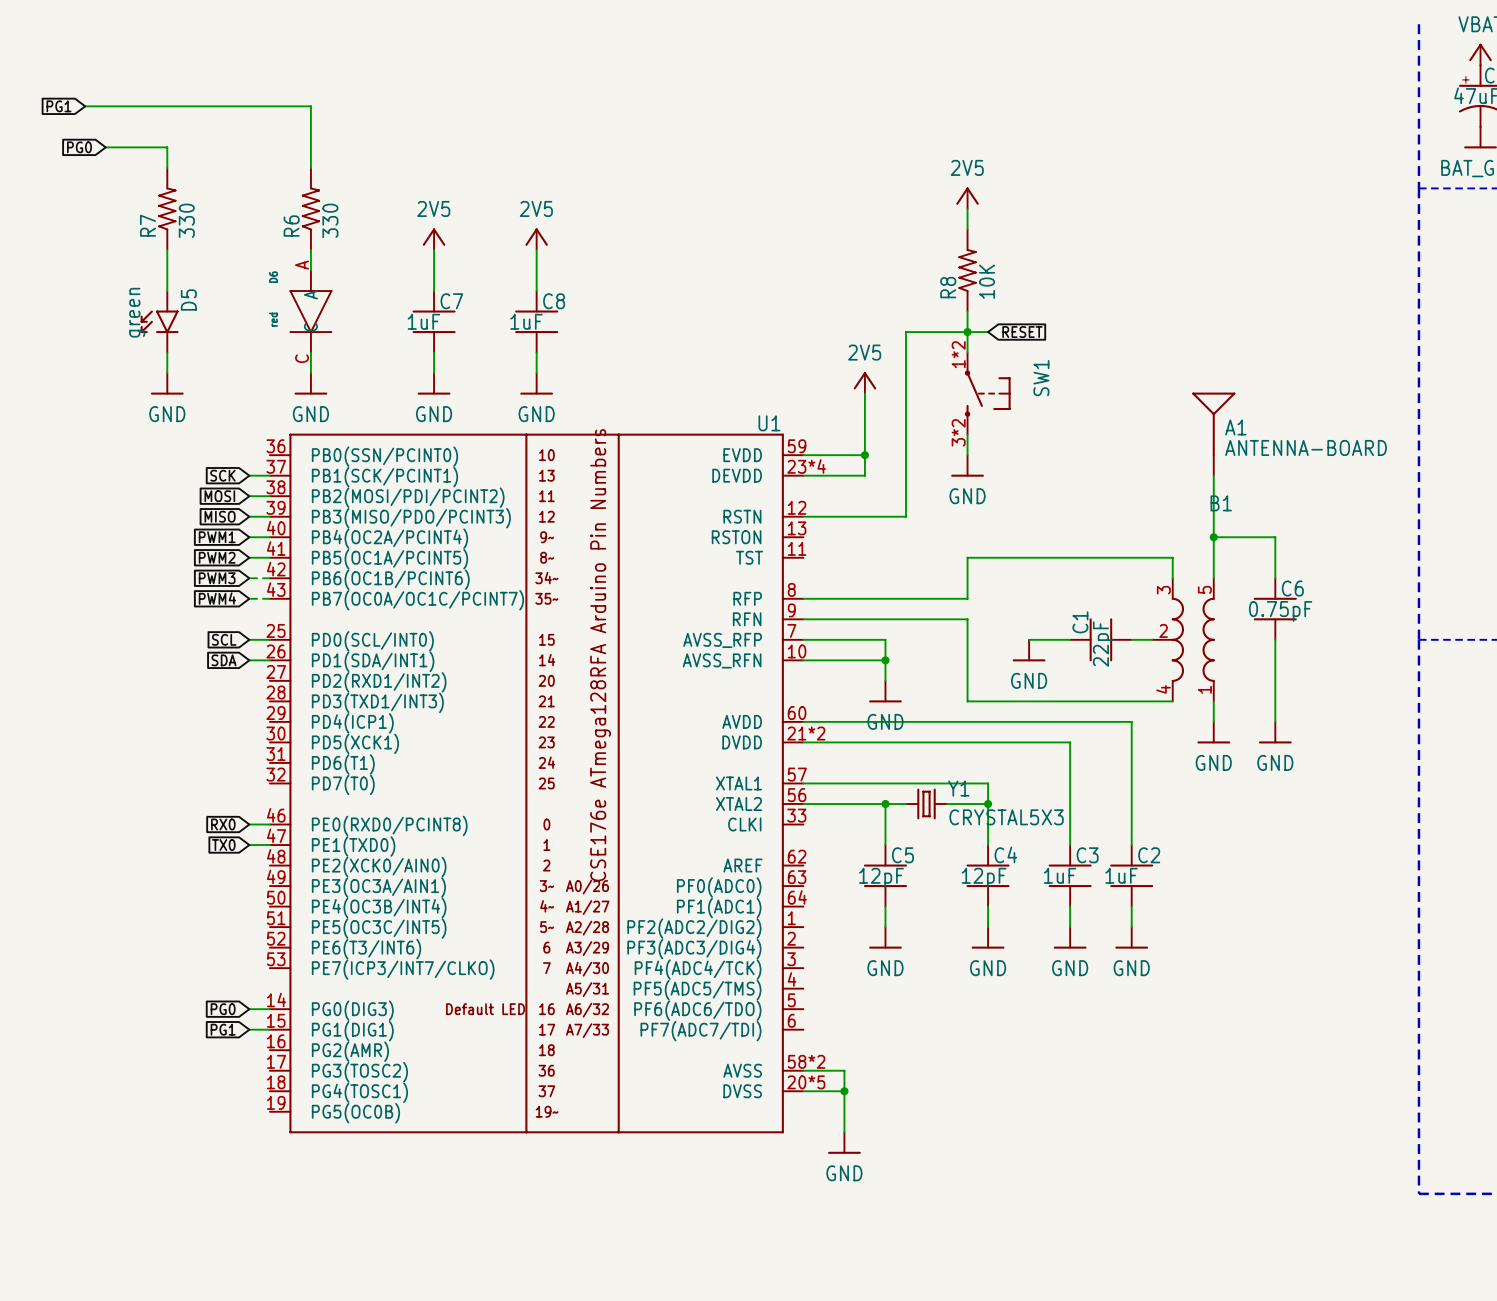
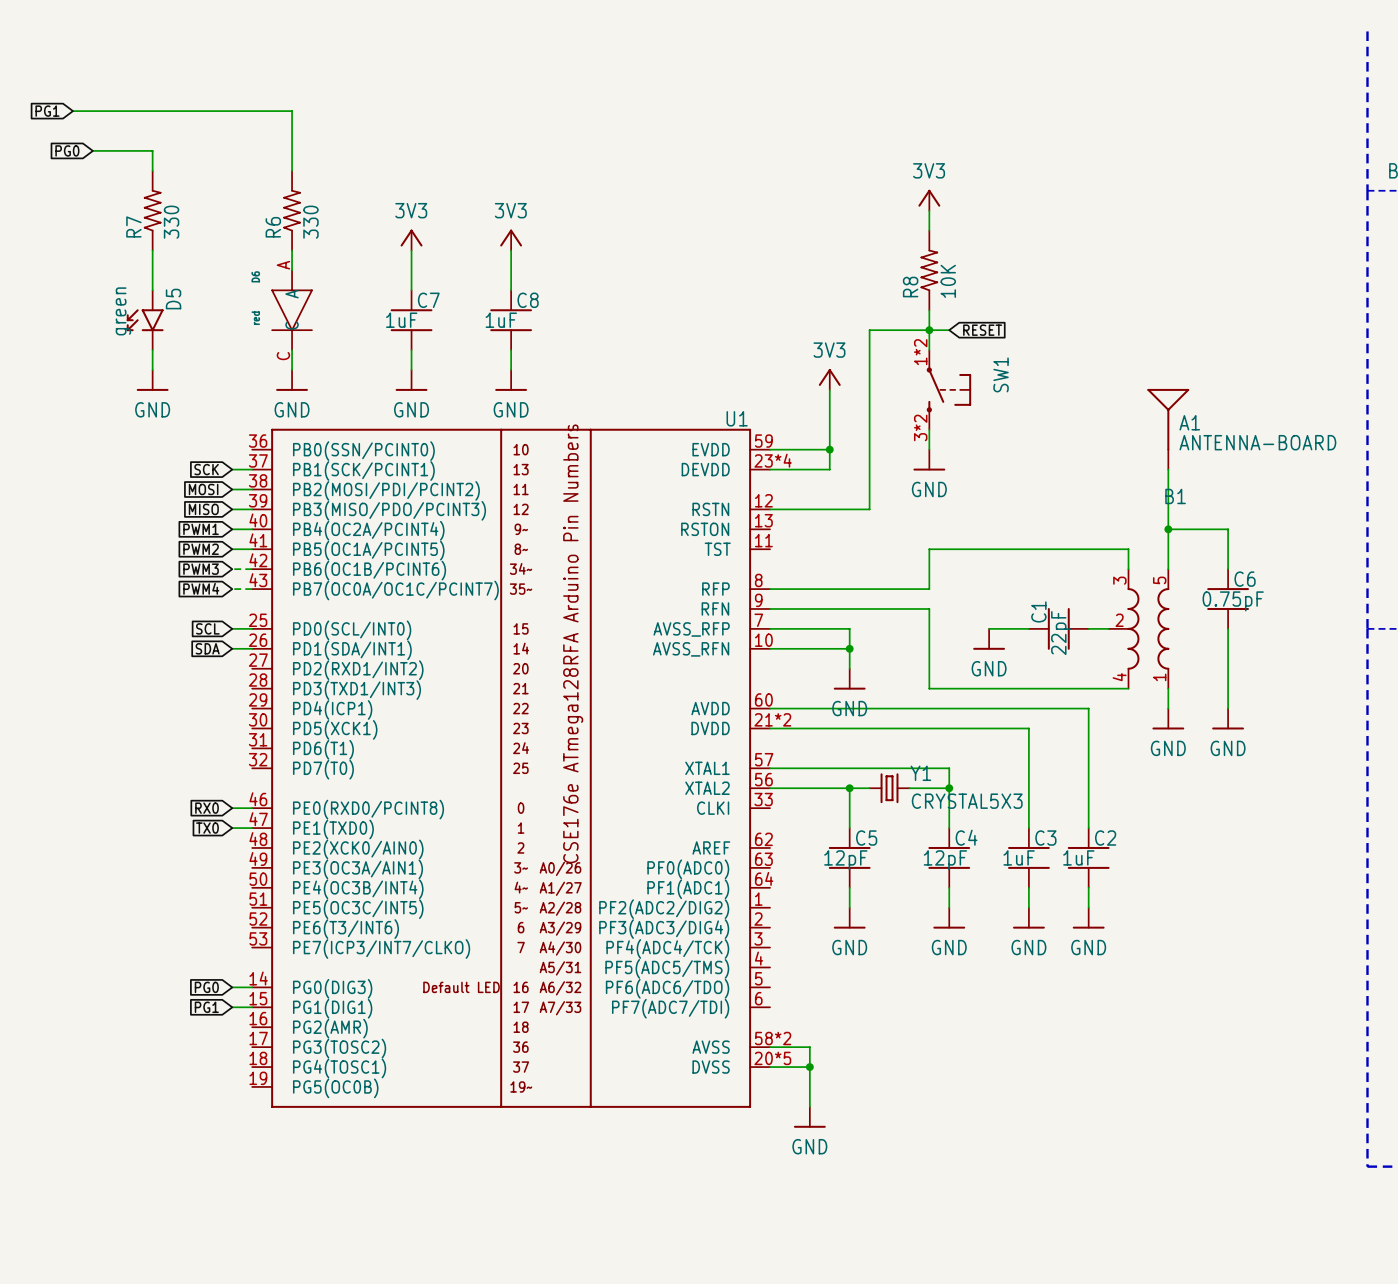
power symbol: 2V5 (967, 198) -> 3V3 (929, 200)
power symbol: 2V5 (434, 239) -> 3V3 (411, 240)
power symbol: 2V5 (536, 239) -> 3V3 (511, 240)
power symbol: 2V5 (864, 382) -> 3V3 (829, 379)

